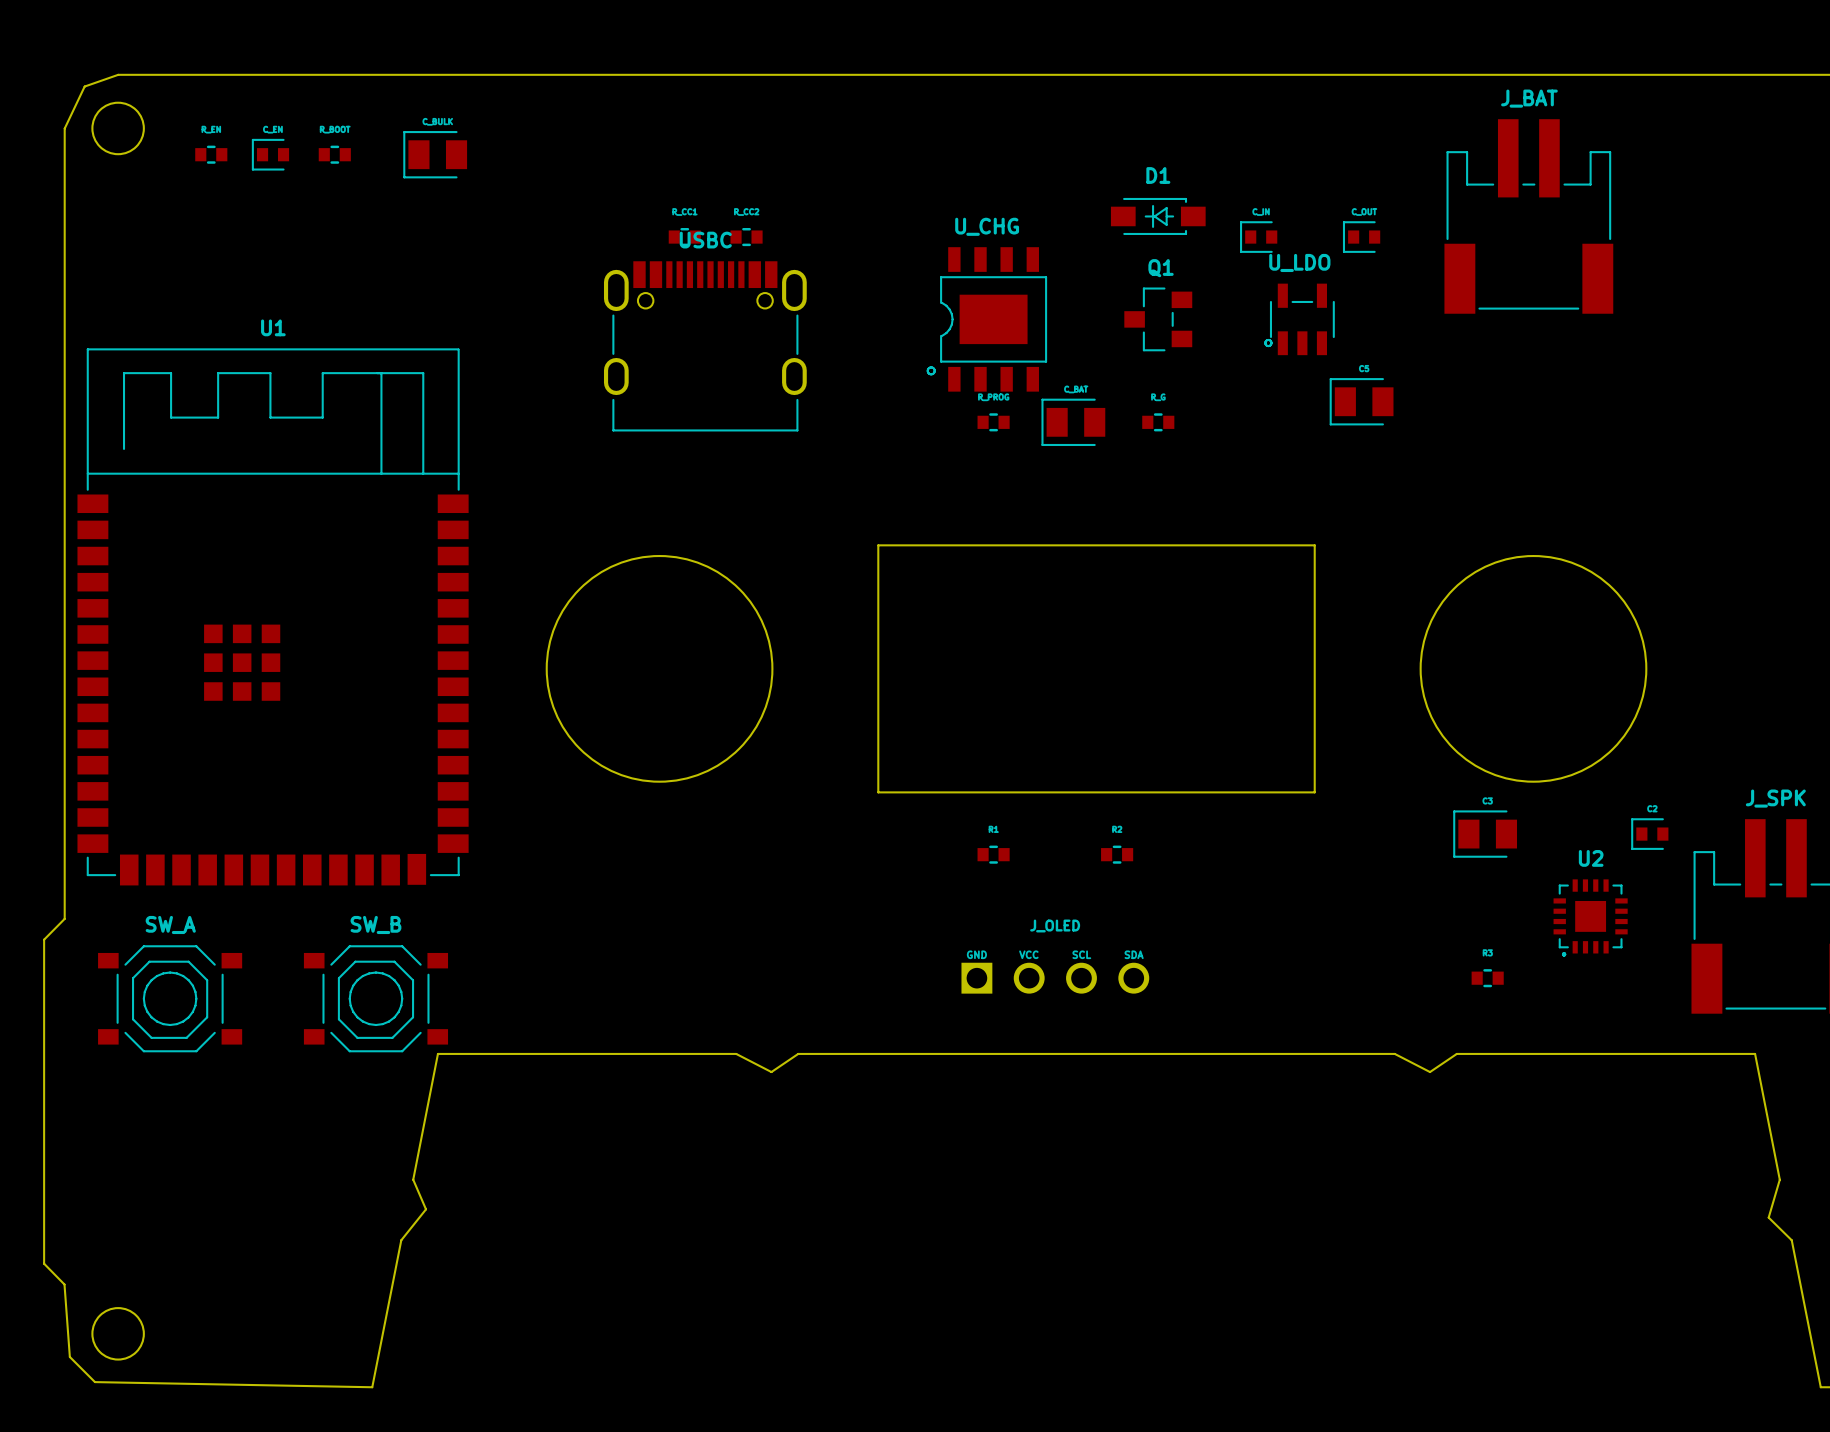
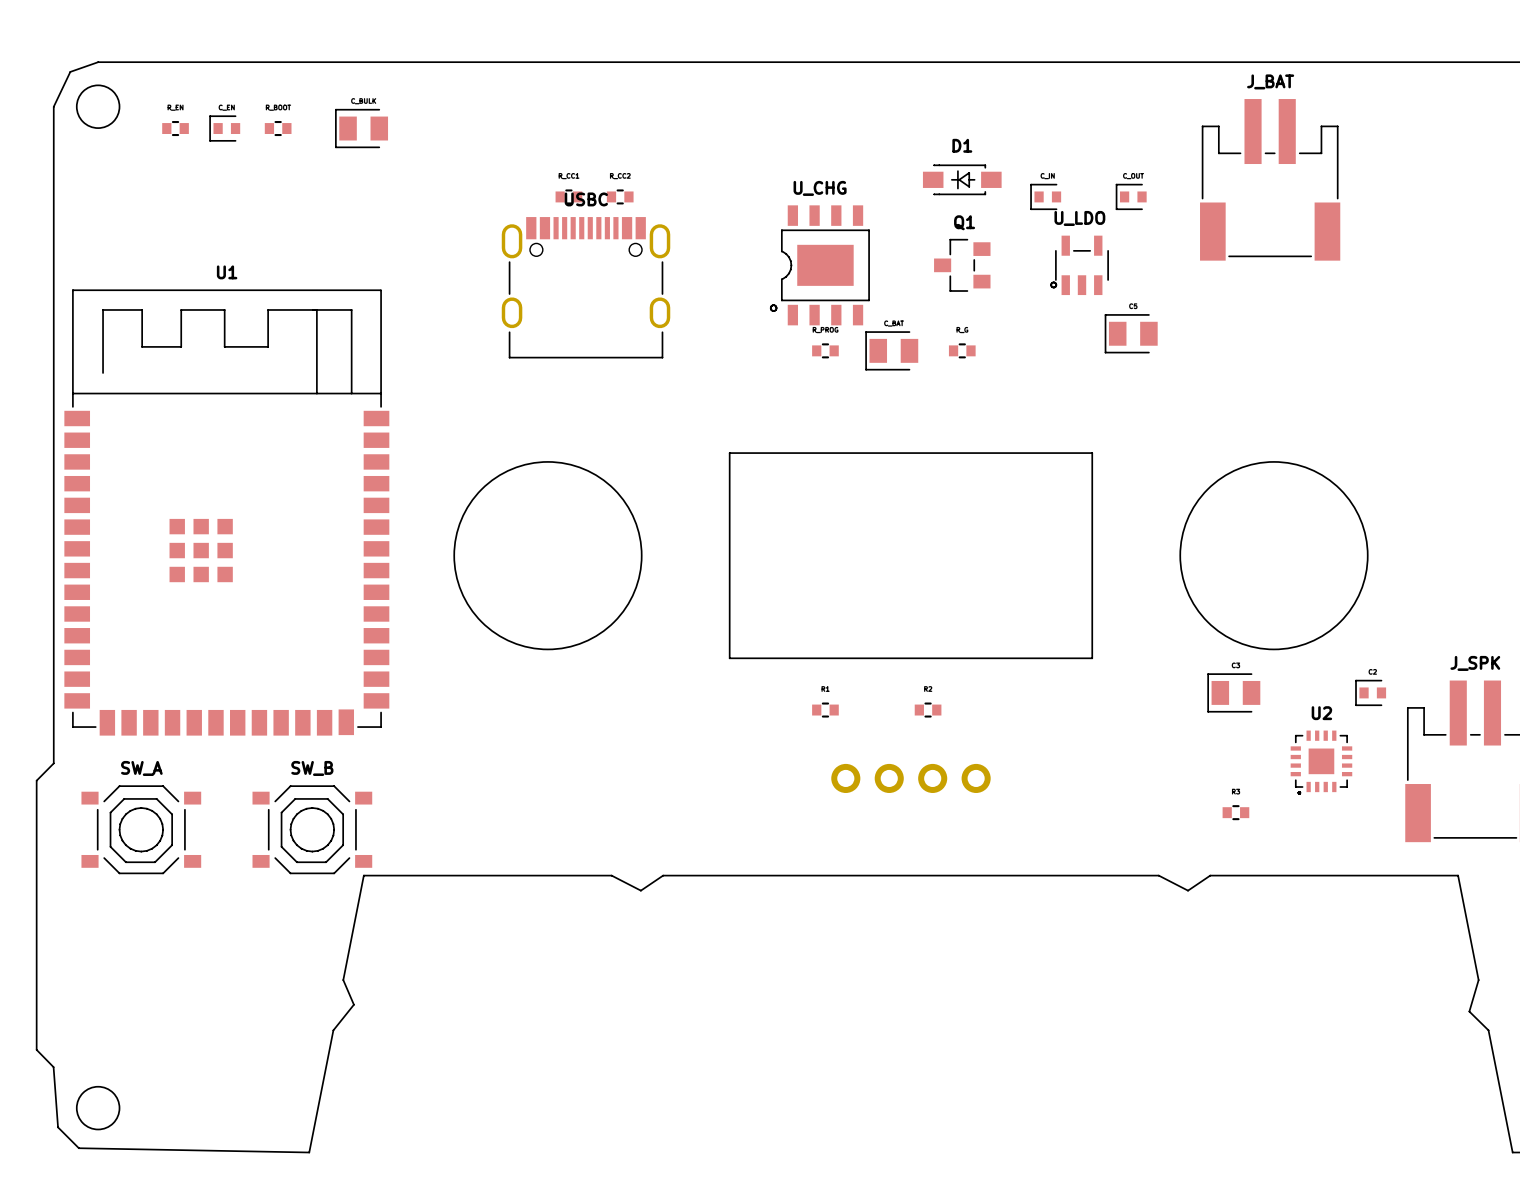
part: none -> (910, 778)
J_OLED: (1055, 978) -> none

